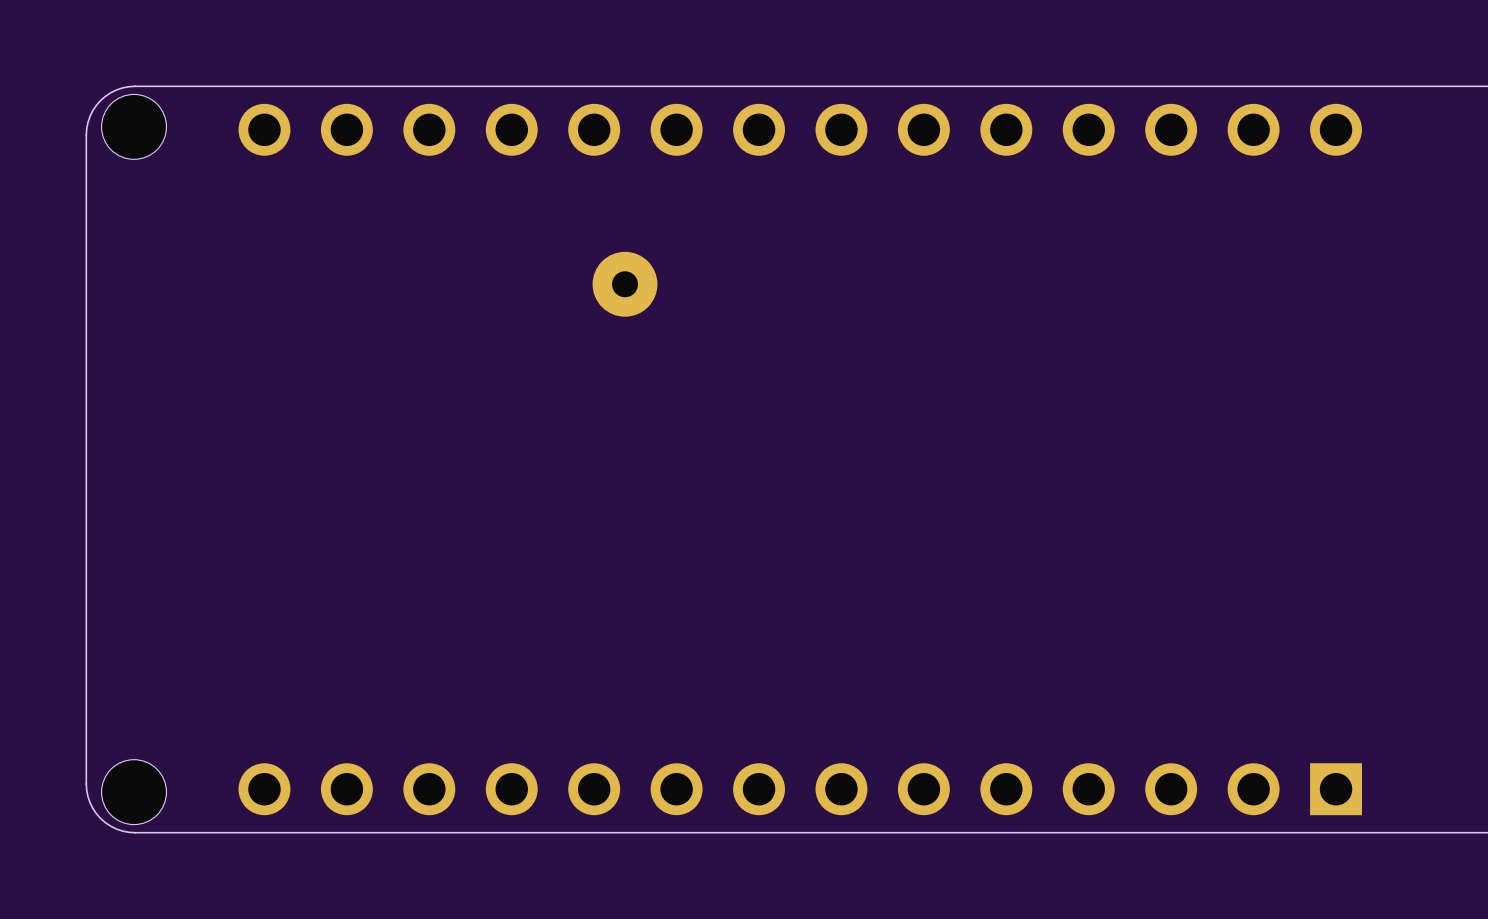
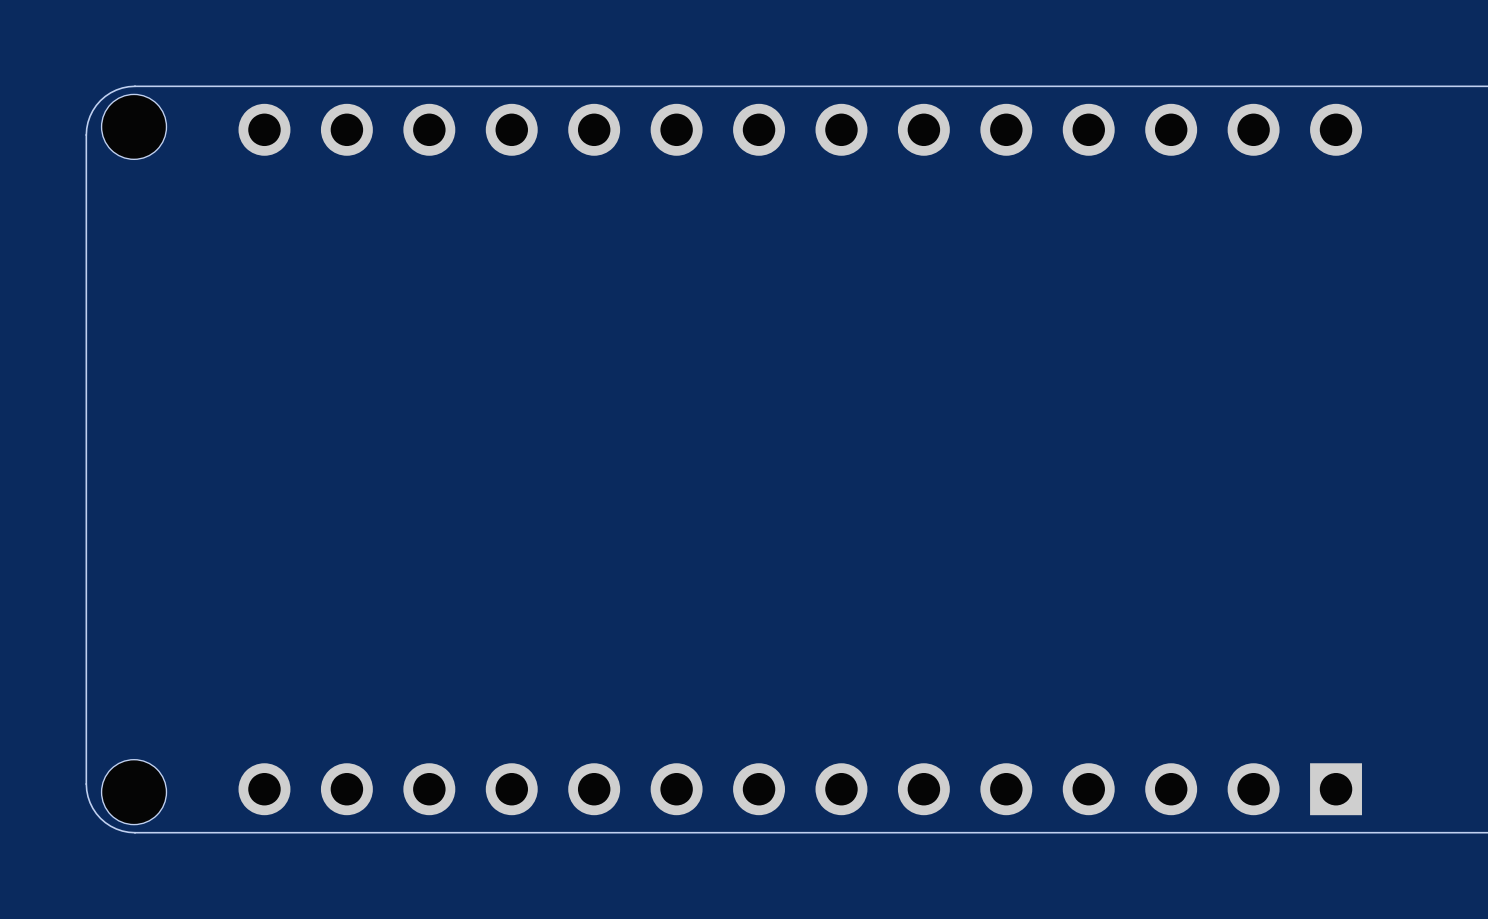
part: (625, 284) -> none

